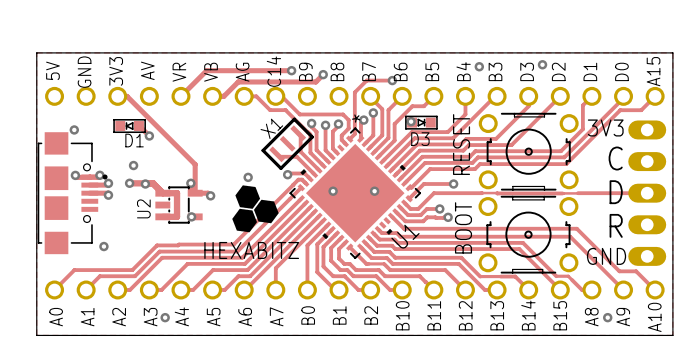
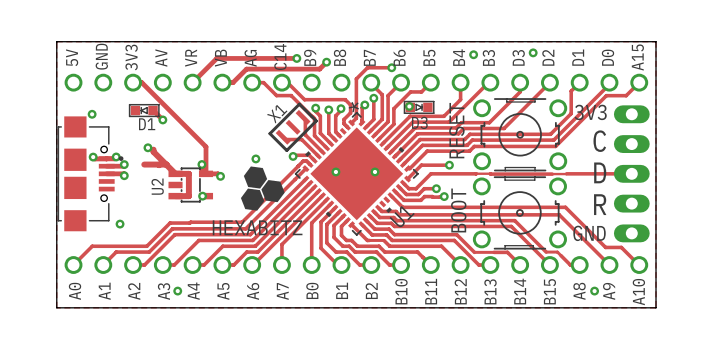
track: none -> (153, 149) (166, 164)
via: (129, 183) -> none
via: (145, 184) -> none

